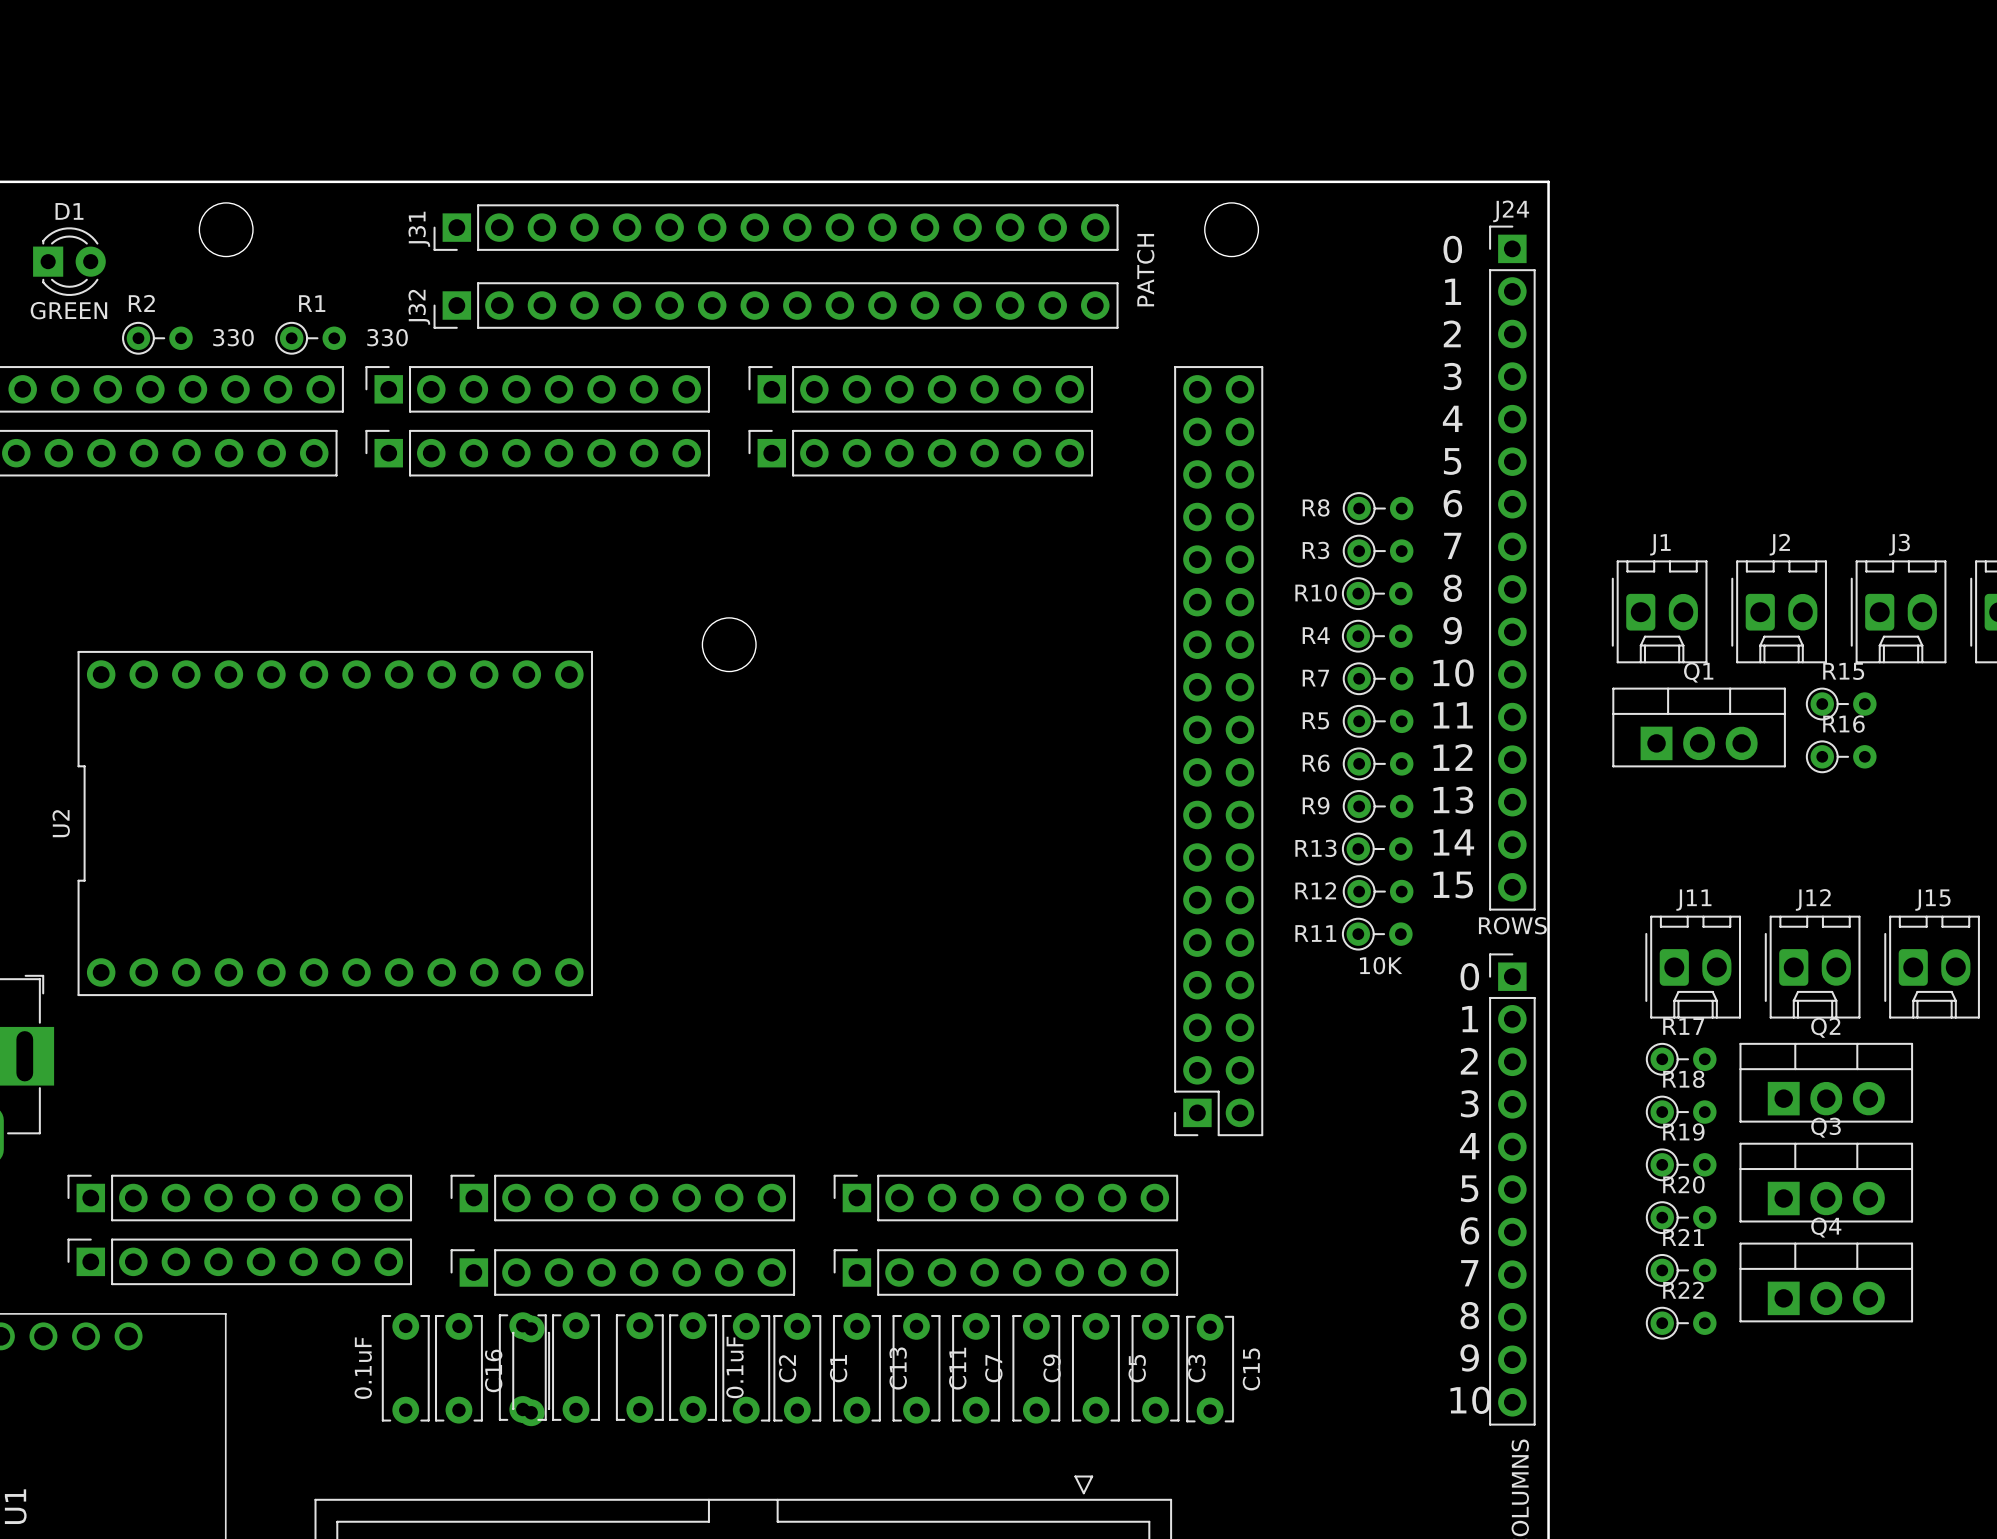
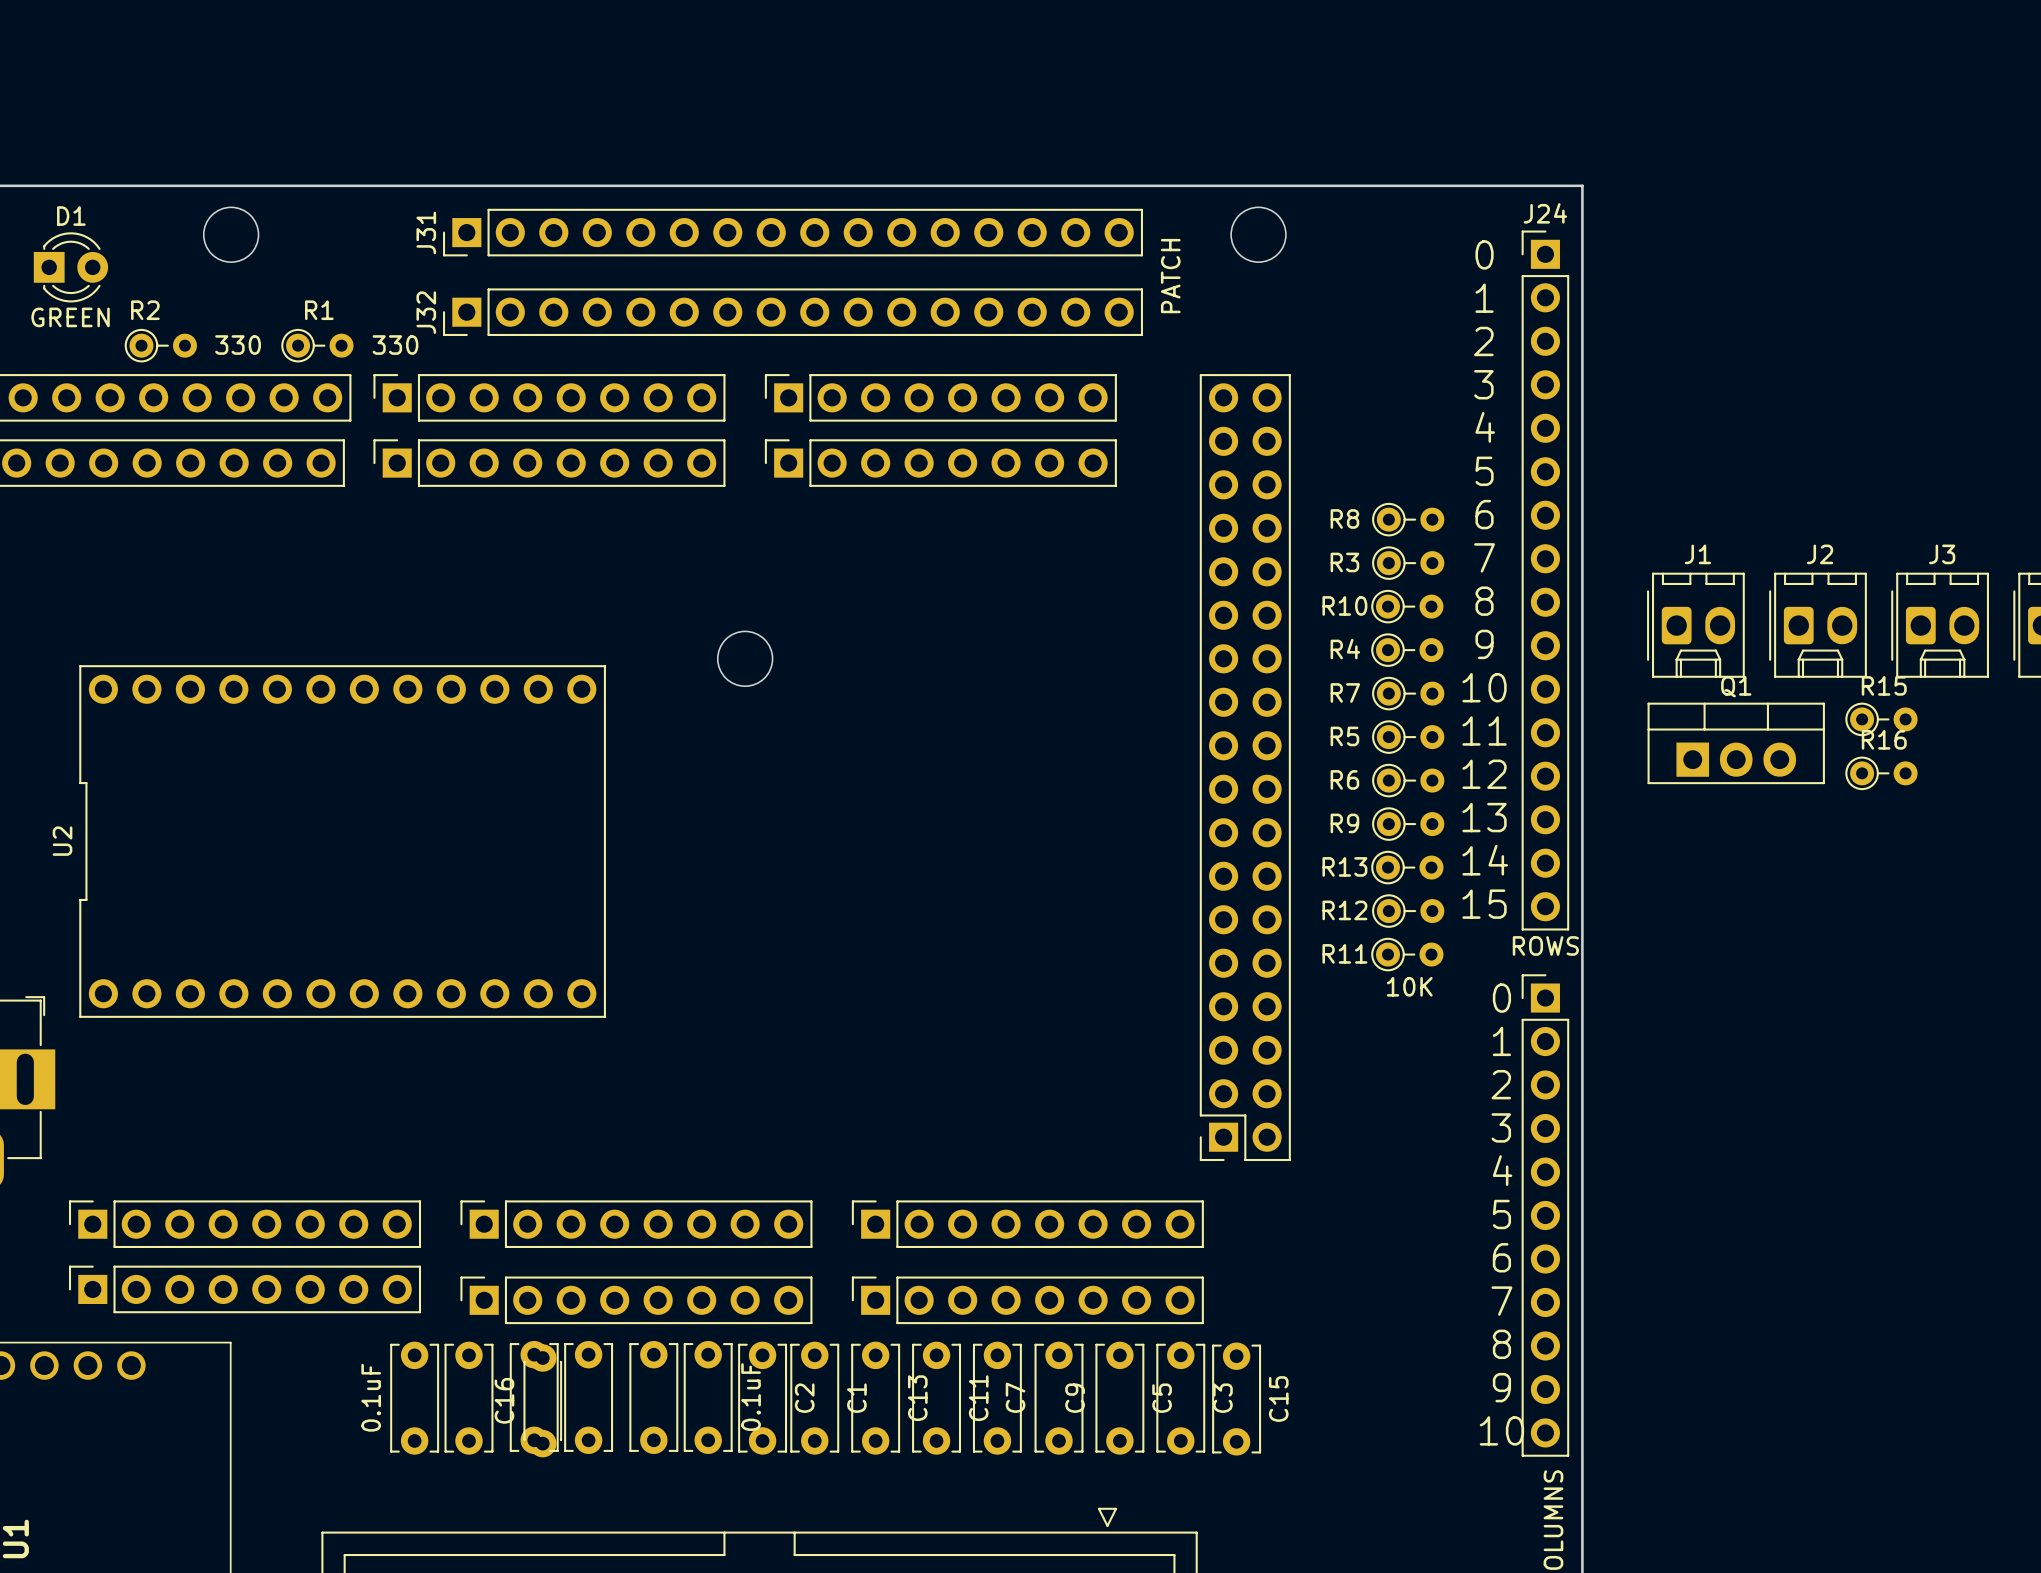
J11: (1693, 967) -> none
J12: (1812, 967) -> none
J15: (1932, 967) -> none
R17: (1681, 1059) -> none
Q2: (1826, 1082) -> none
R18: (1681, 1112) -> none
R19: (1681, 1164) -> none
Q3: (1826, 1182) -> none
R20: (1681, 1217) -> none
R21: (1681, 1270) -> none
Q4: (1826, 1282) -> none
R22: (1681, 1323) -> none

